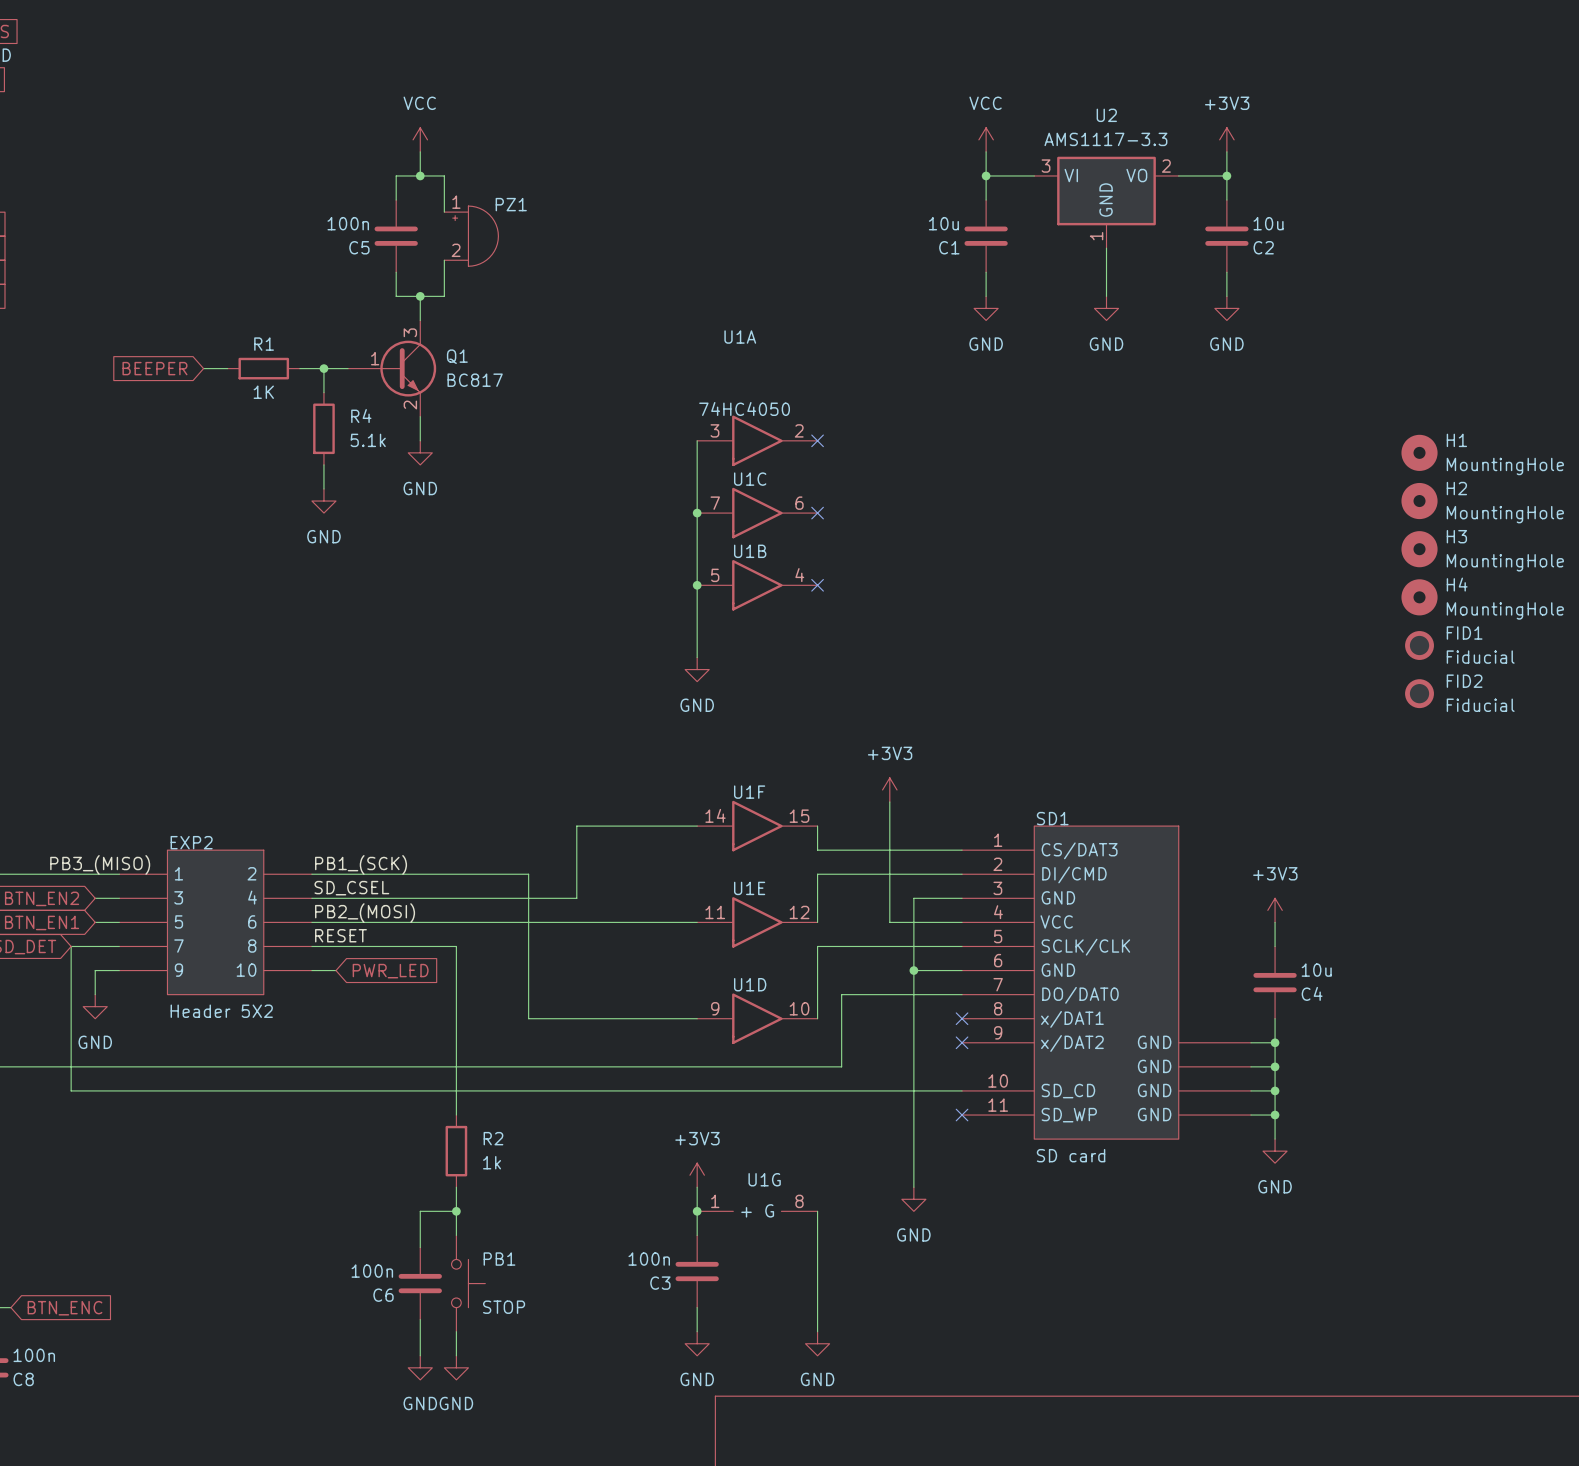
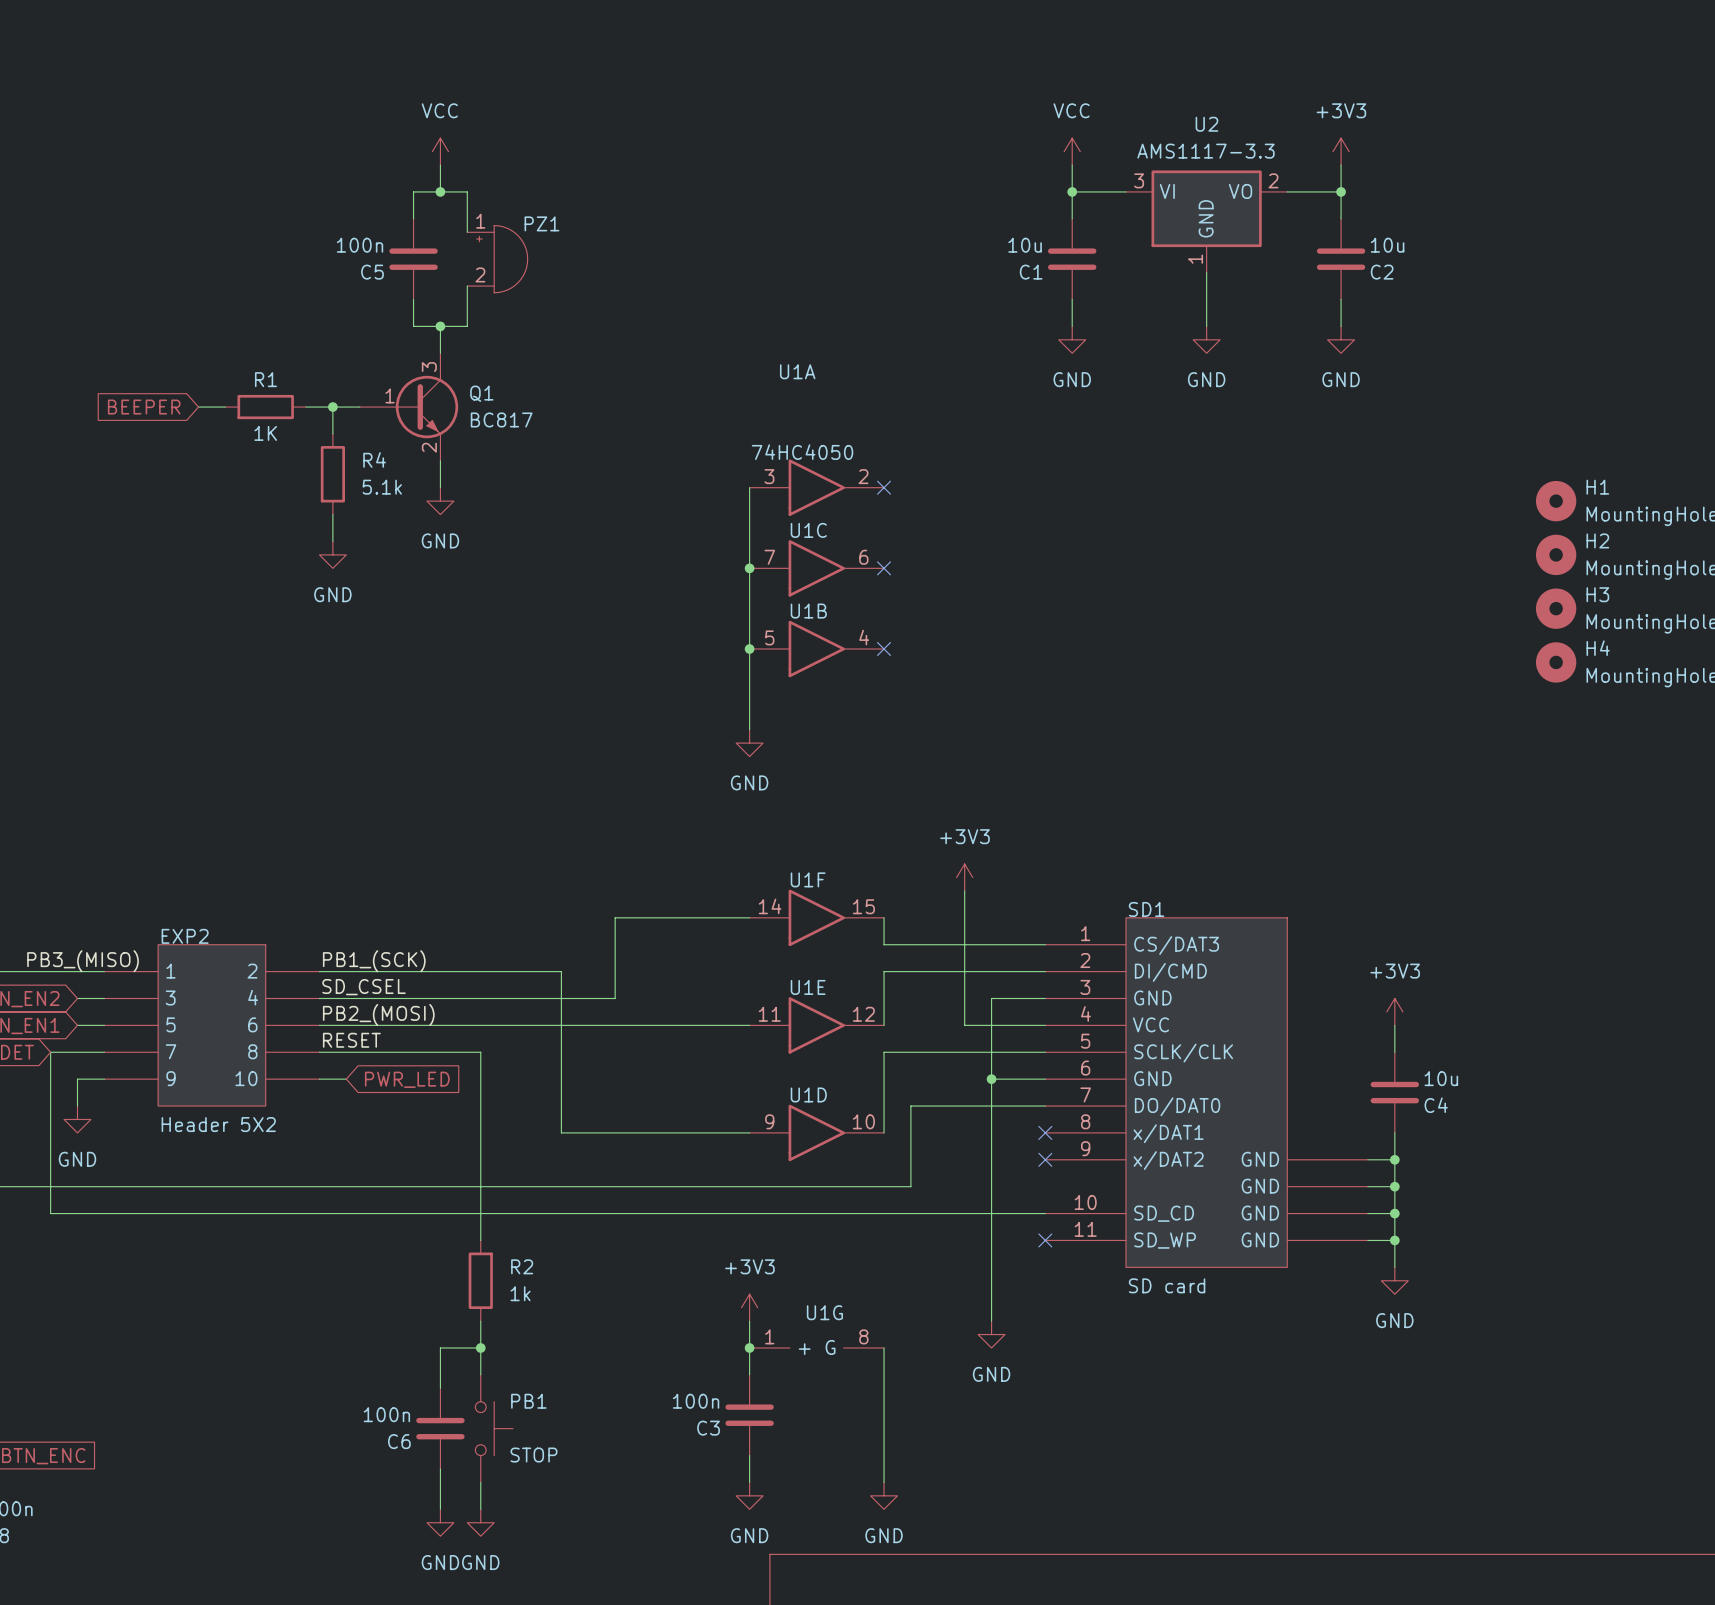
FID1: Fiducial (1419, 645) -> none
FID2: Fiducial (1419, 693) -> none

